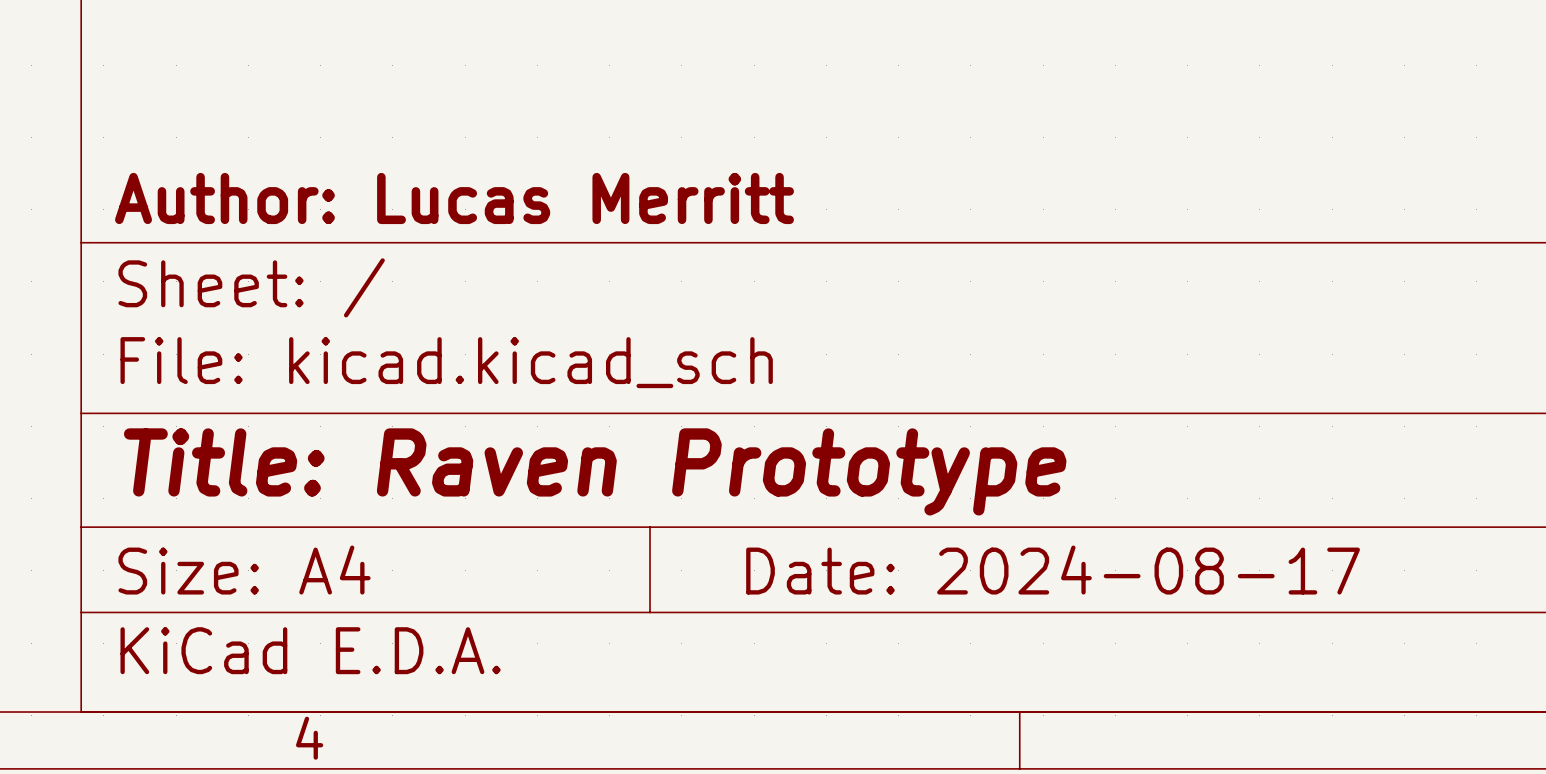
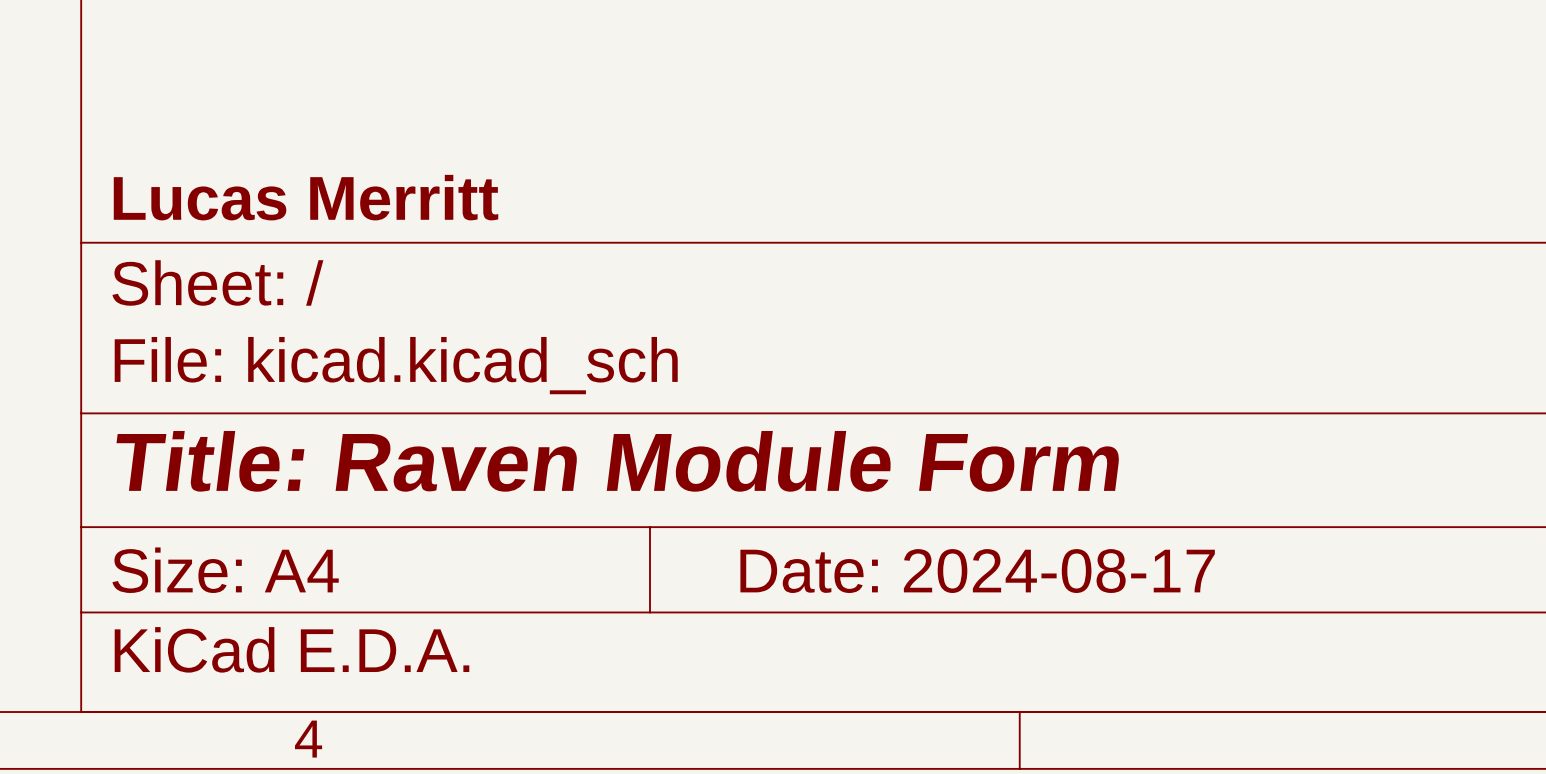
title block: Author: Lucas Merritt (454, 198) -> Lucas Merritt (306, 197)
title block: Title: Raven Prototype (595, 471) -> Title: Raven Module Form (618, 461)

